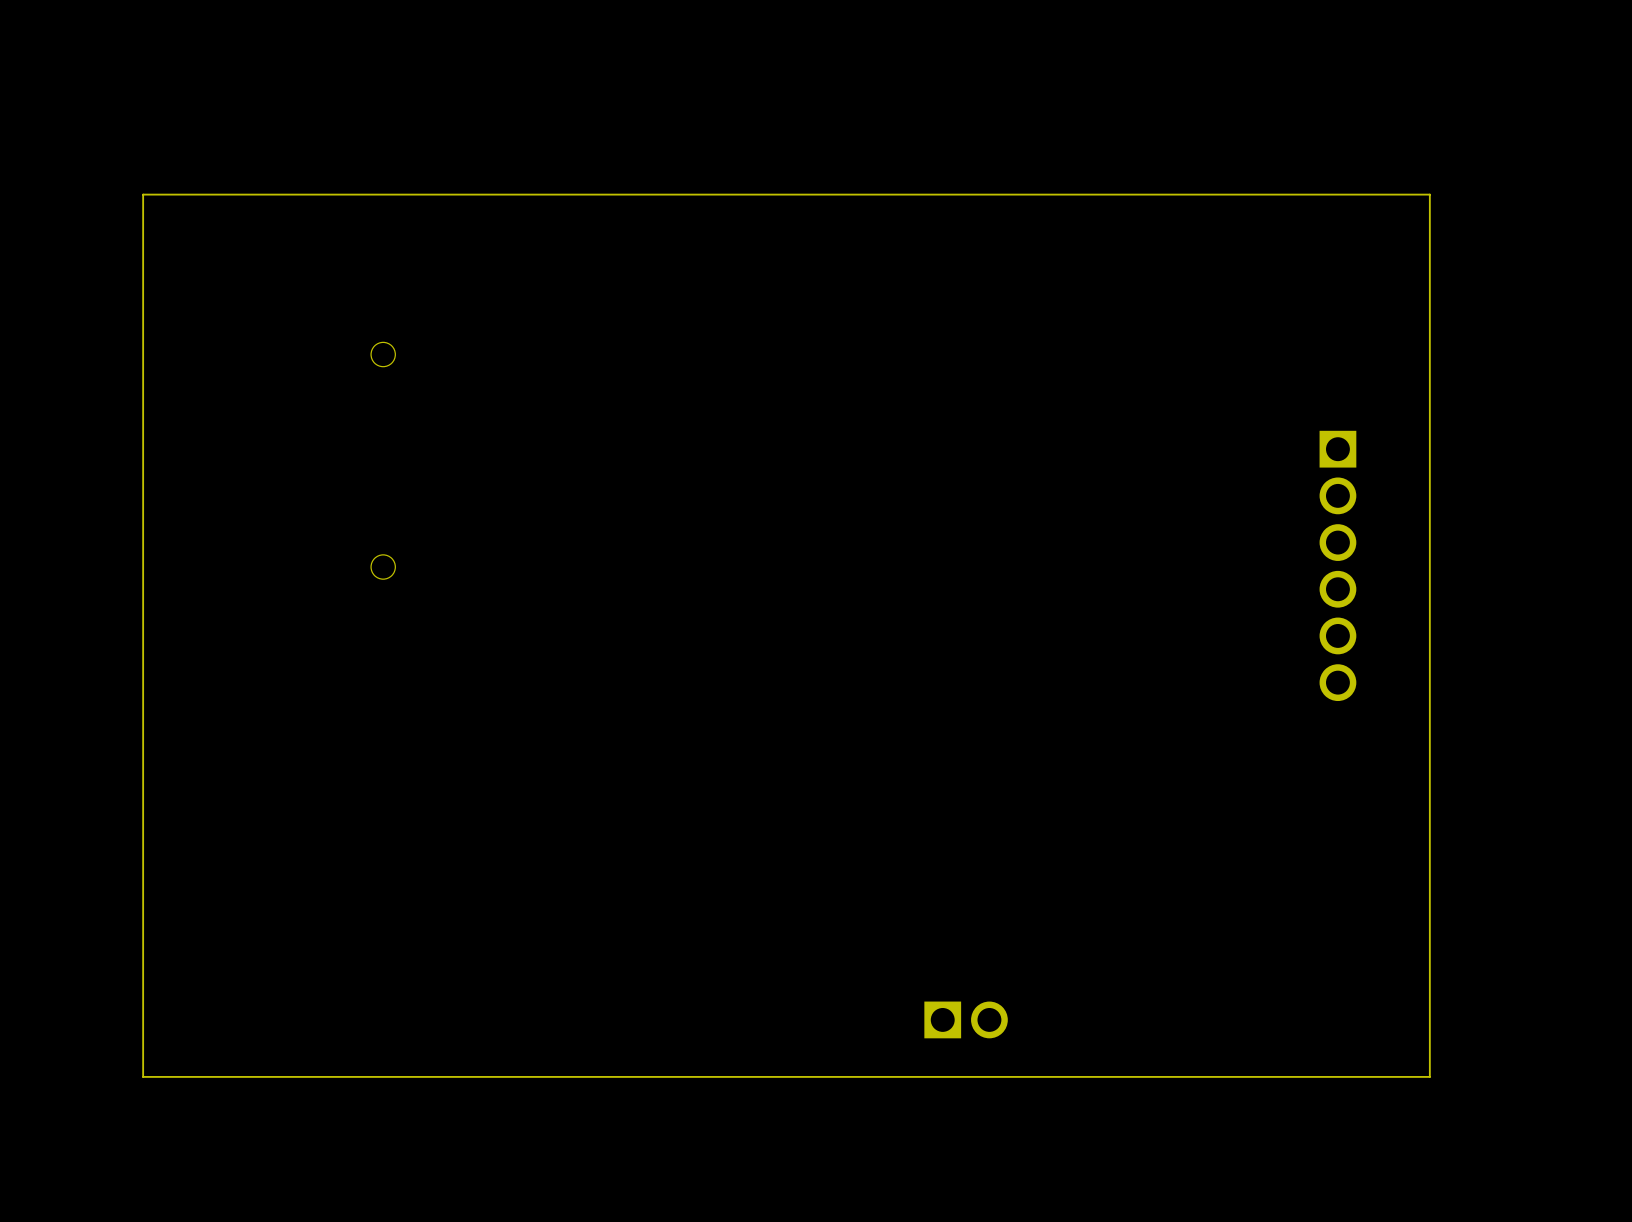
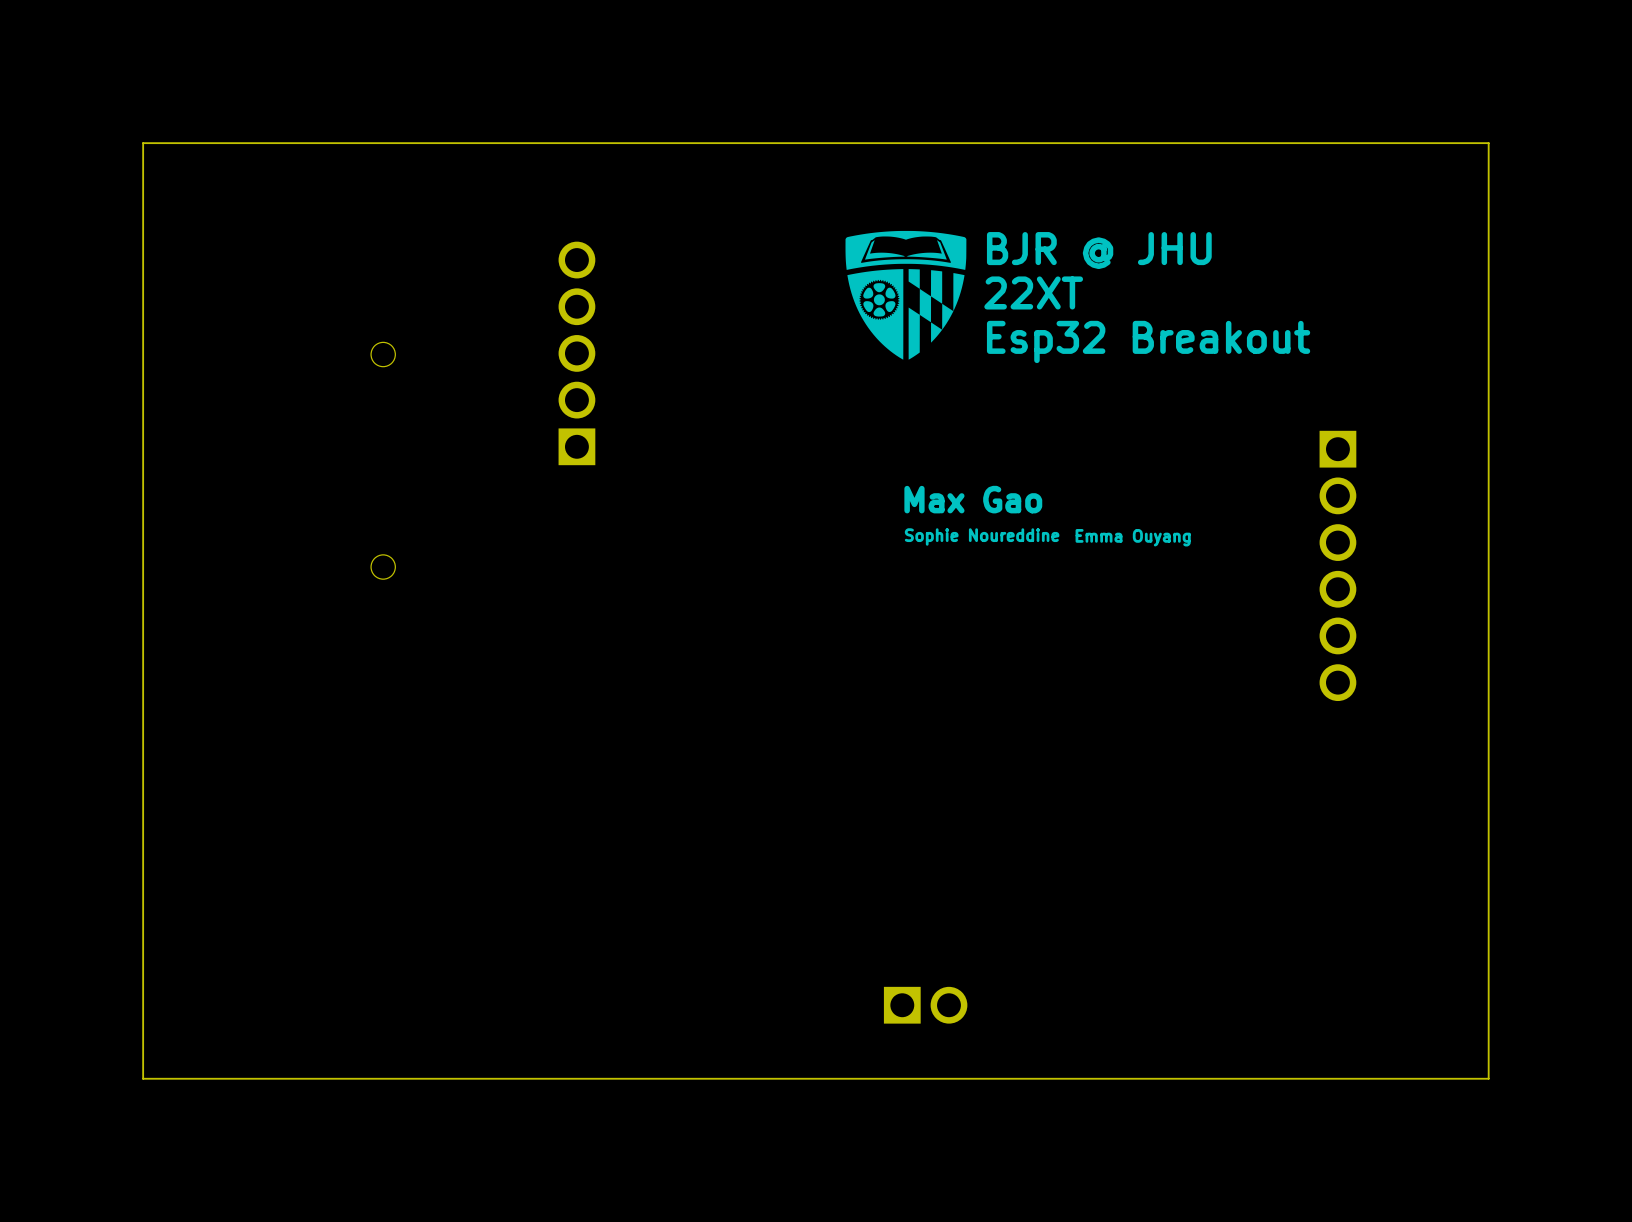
board edge: (143, 194) (1429, 194) (1429, 1076) (143, 1076) -> (143, 194) (143, 143) (1488, 143) (1488, 1078) (143, 1078) (143, 1076)
drawing: none -> [845, 230, 967, 360]
text: none -> BJR @ JHU (1099, 250)
text: none -> 22XT (1033, 292)
text: none -> Esp32 Breakout (1148, 341)
part: none -> (576, 353)
text: none -> Max Gao (973, 499)
text: none -> Sophie Noureddine (982, 536)
text: none -> Emma Ouyang (1133, 537)
part position: (966, 1019) -> (925, 1005)

